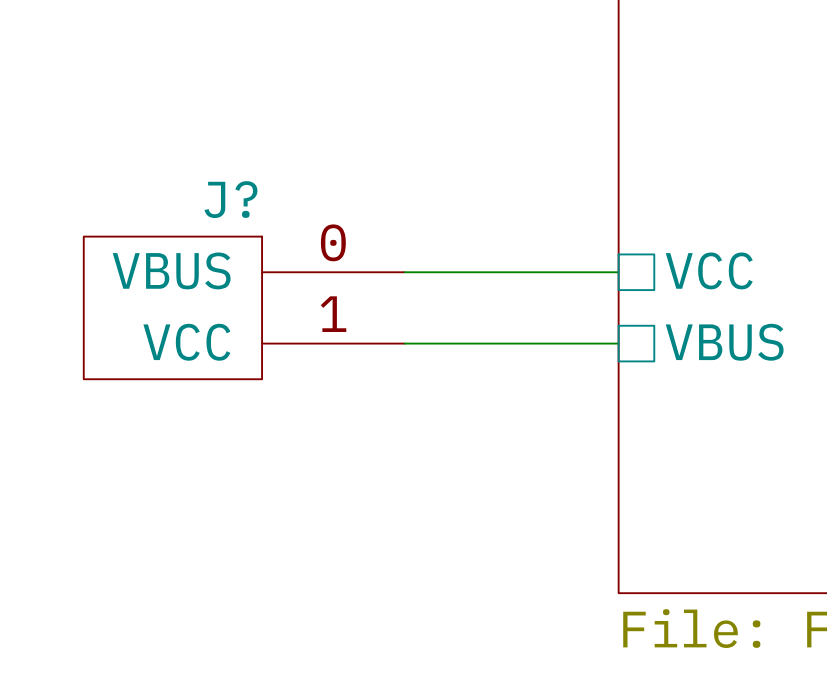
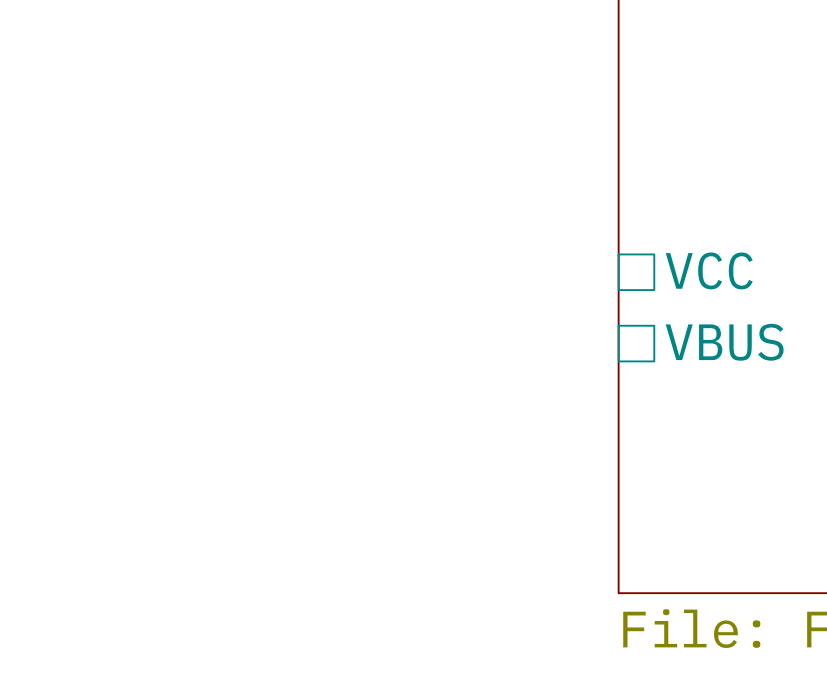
wire: (404, 272) (618, 272) -> none
J?: (244, 307) -> none
wire: (404, 343) (618, 343) -> none

